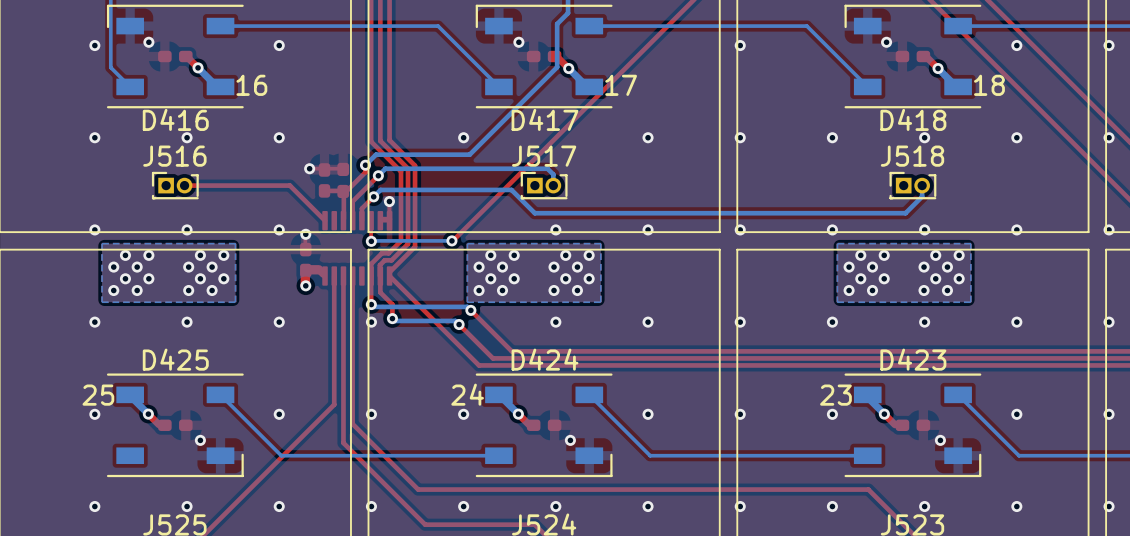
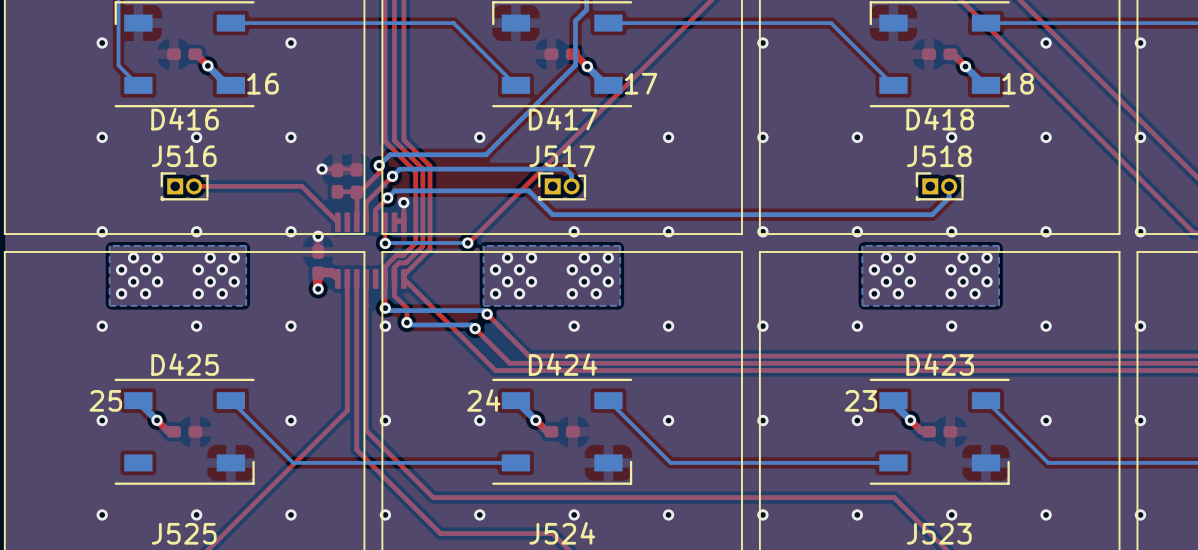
via: (148, 42) -> none
via: (518, 42) -> none
via: (886, 42) -> none
via: (200, 440) -> none
via: (570, 440) -> none
via: (940, 440) -> none

